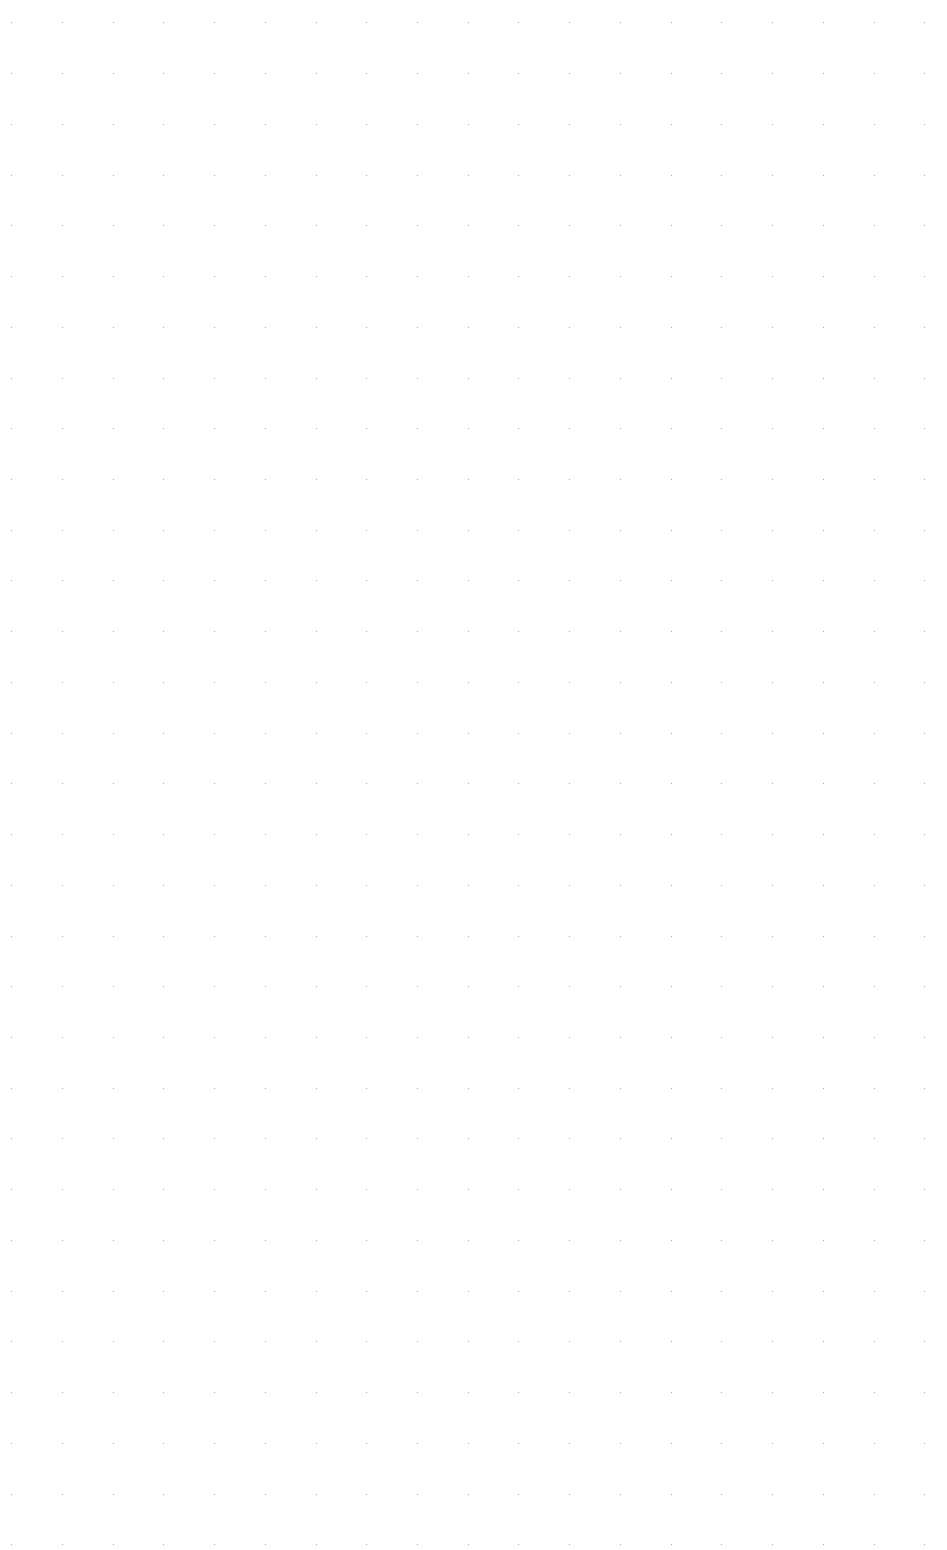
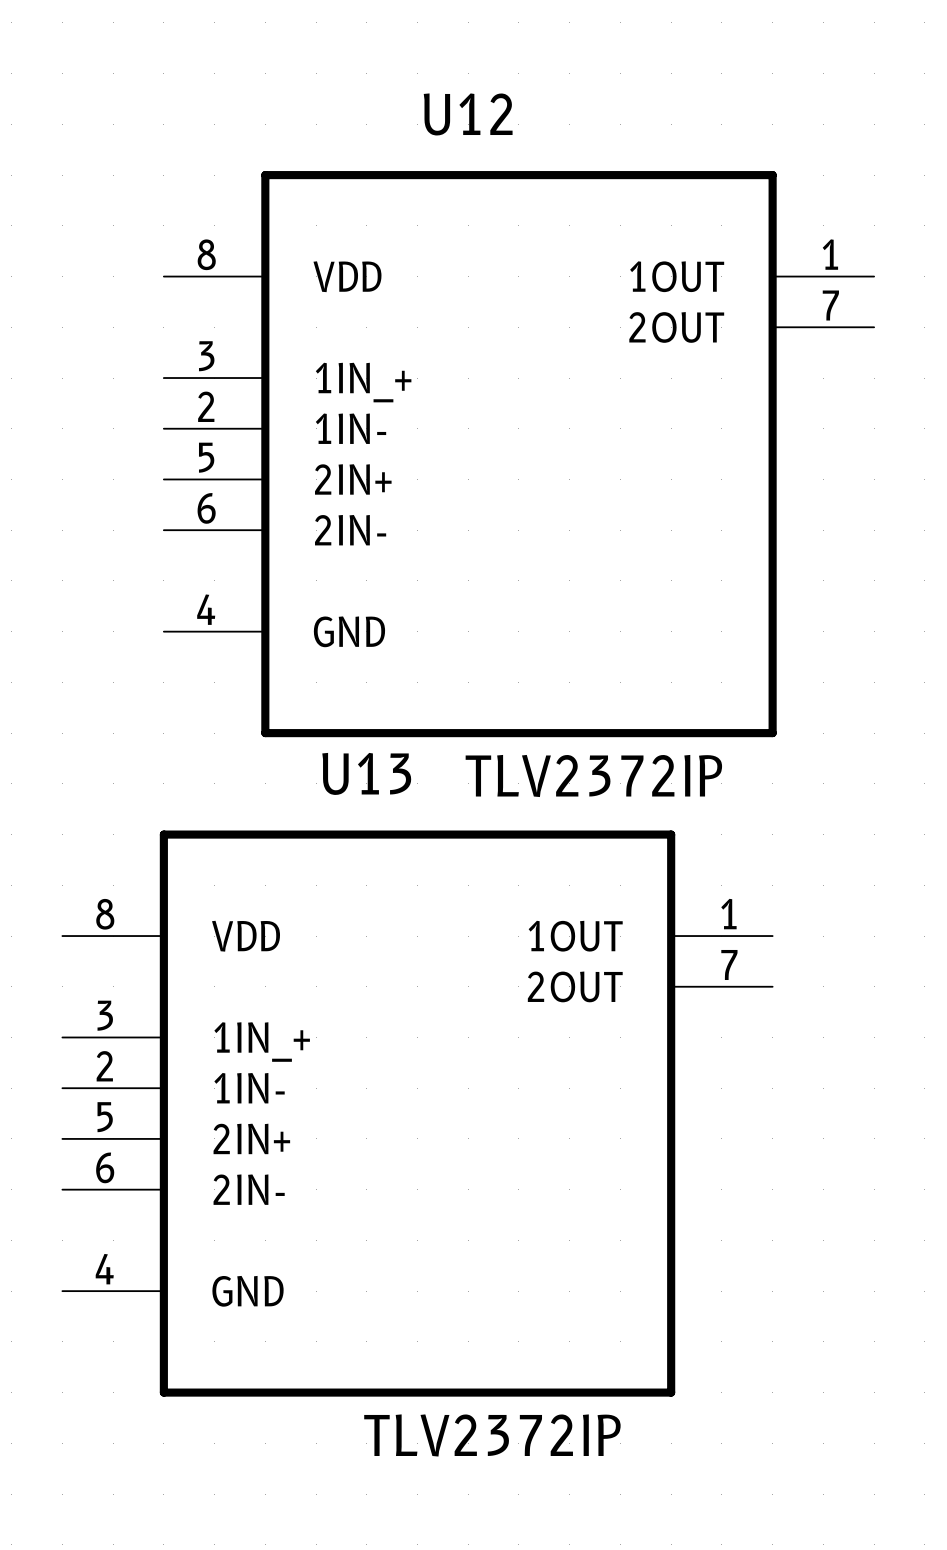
U12: none -> TLV2372IP (518, 454)
U13: none -> TLV2372IP (417, 1113)

